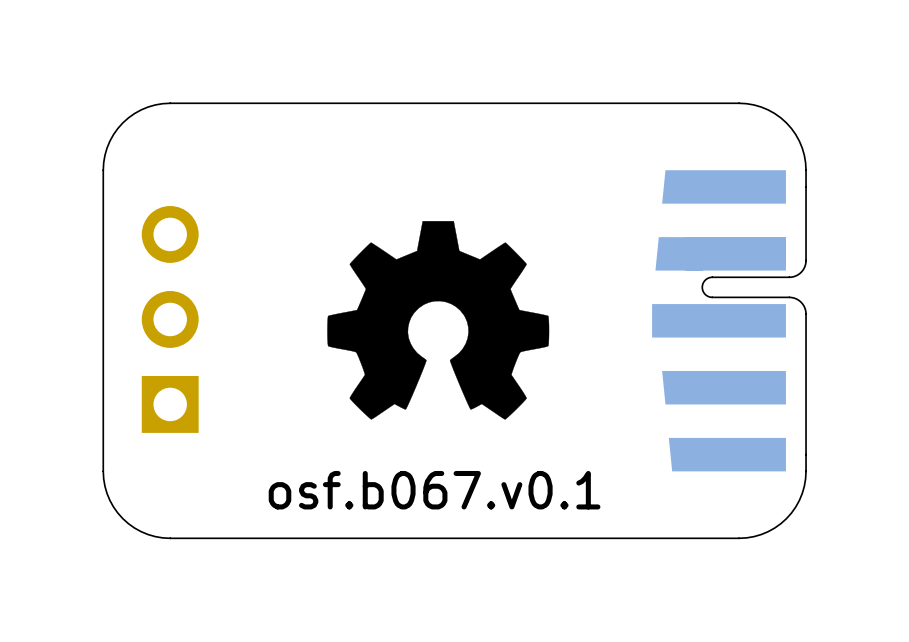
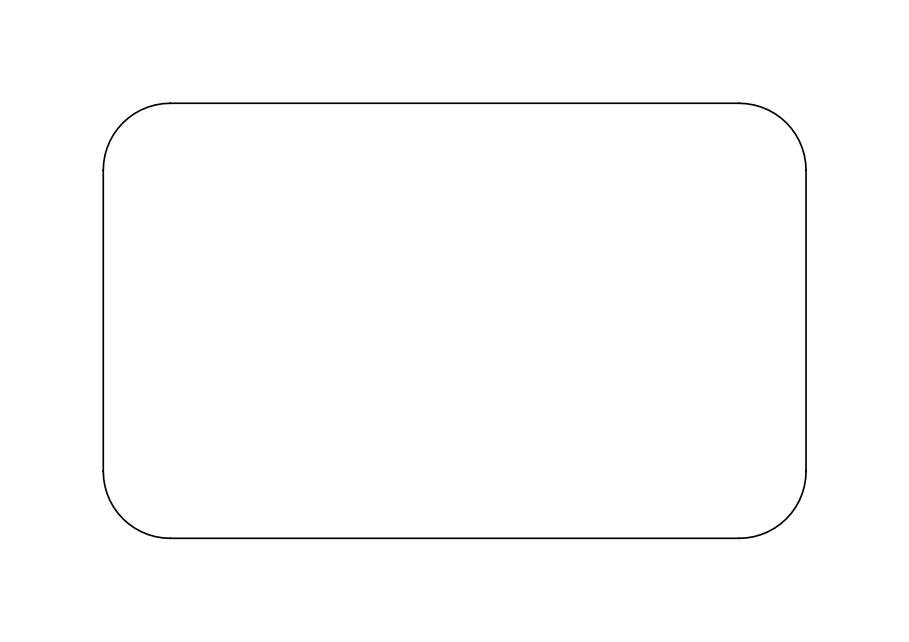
board edge: none -> (806, 186) (806, 454)
drawing: [327, 221, 550, 420] -> none
part: (170, 319) -> none
part: (729, 320) -> none
text: osf.b067.v0.1 (434, 490) -> none

